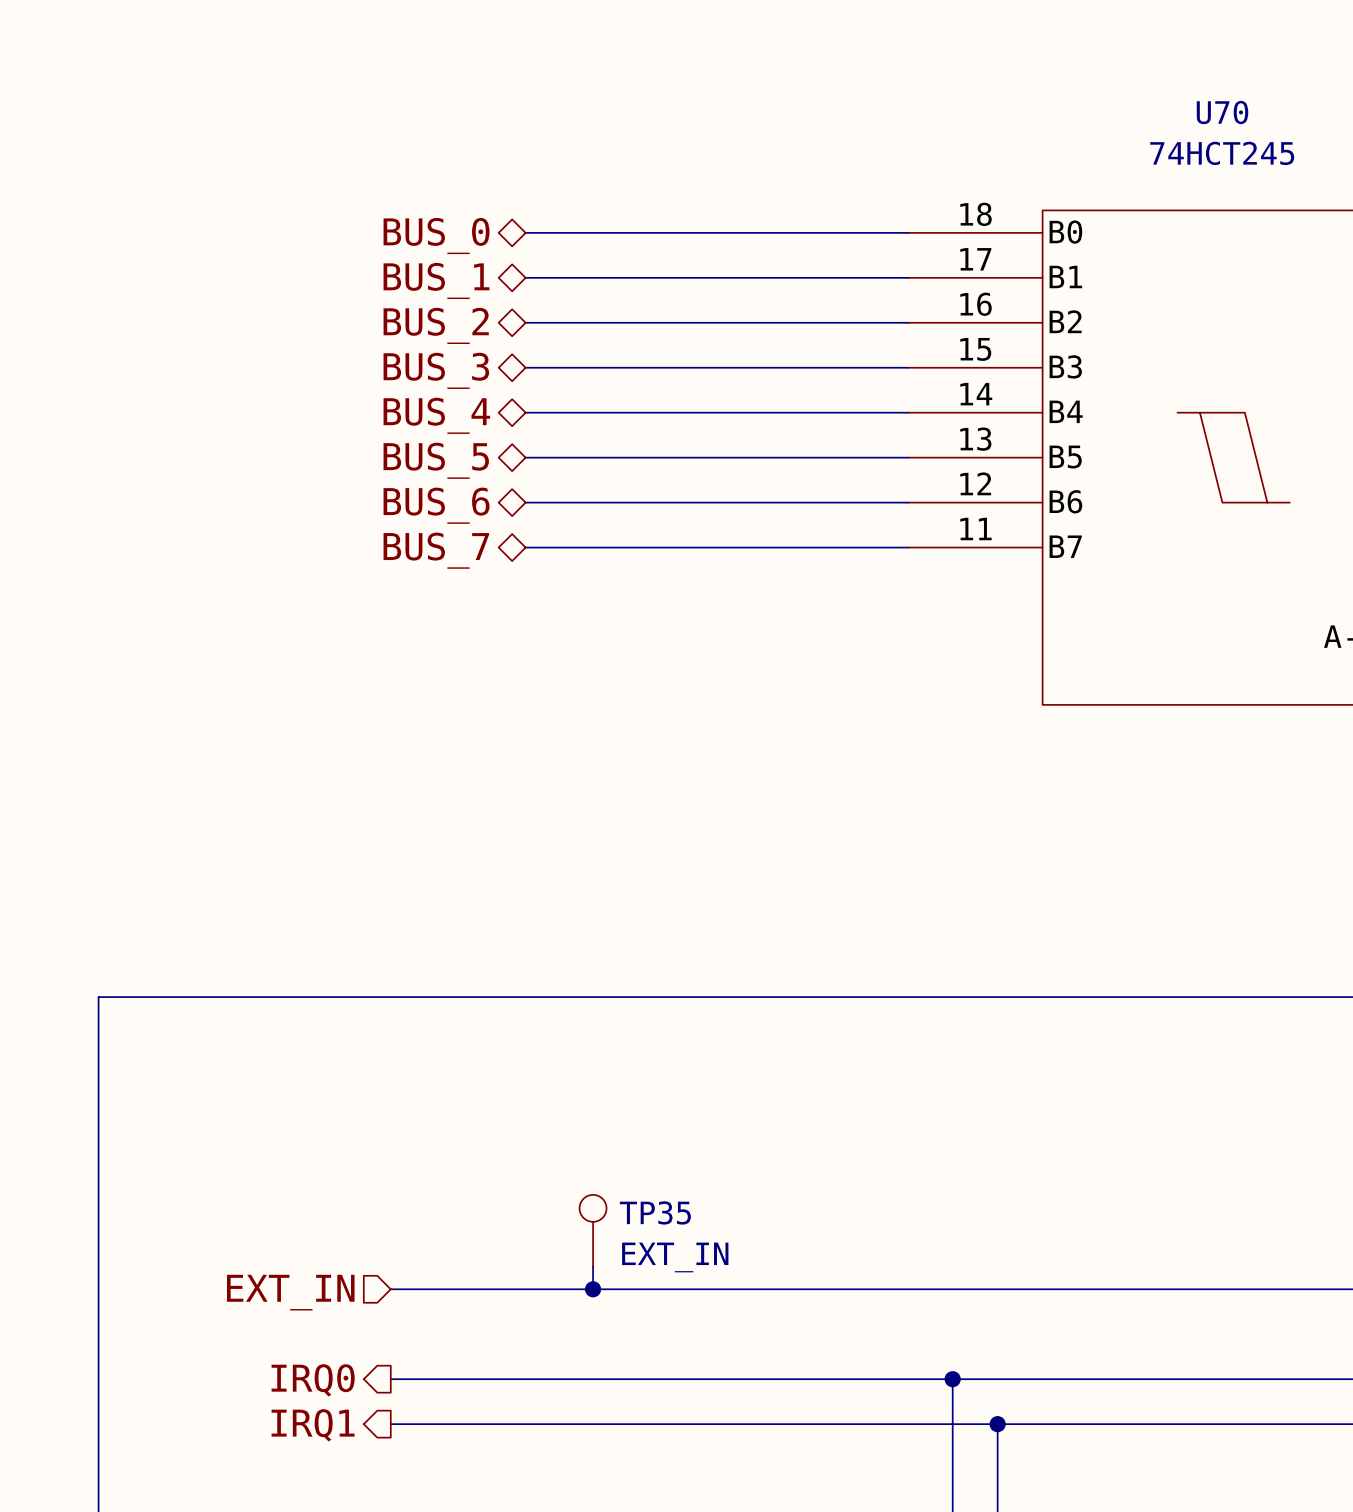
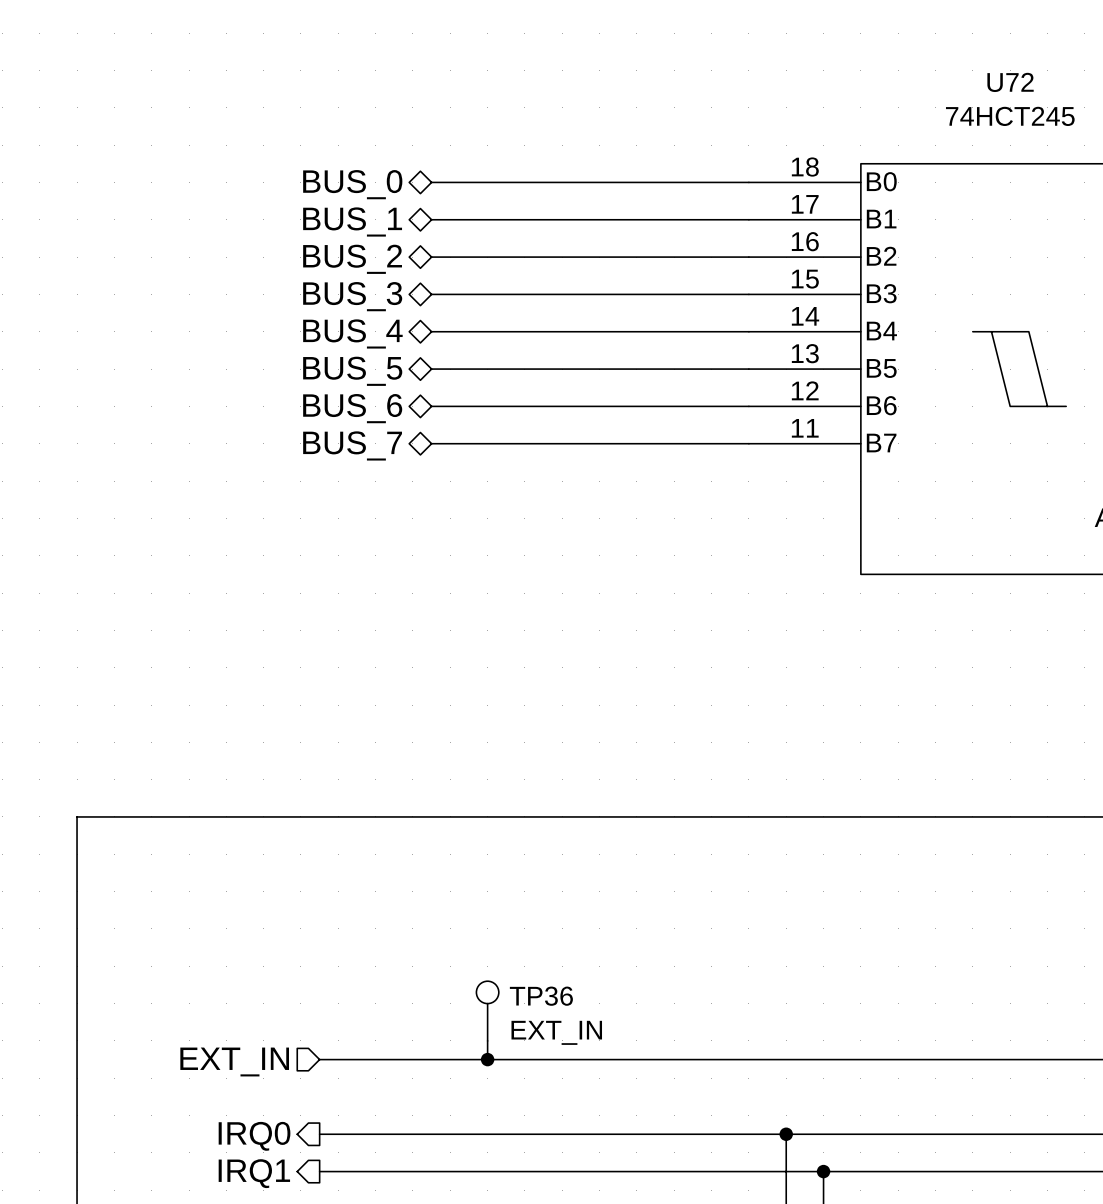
U70 name: U70 (1222, 112) -> U72 (1010, 82)
TP35 name: TP35 (655, 1212) -> TP36 (541, 996)

